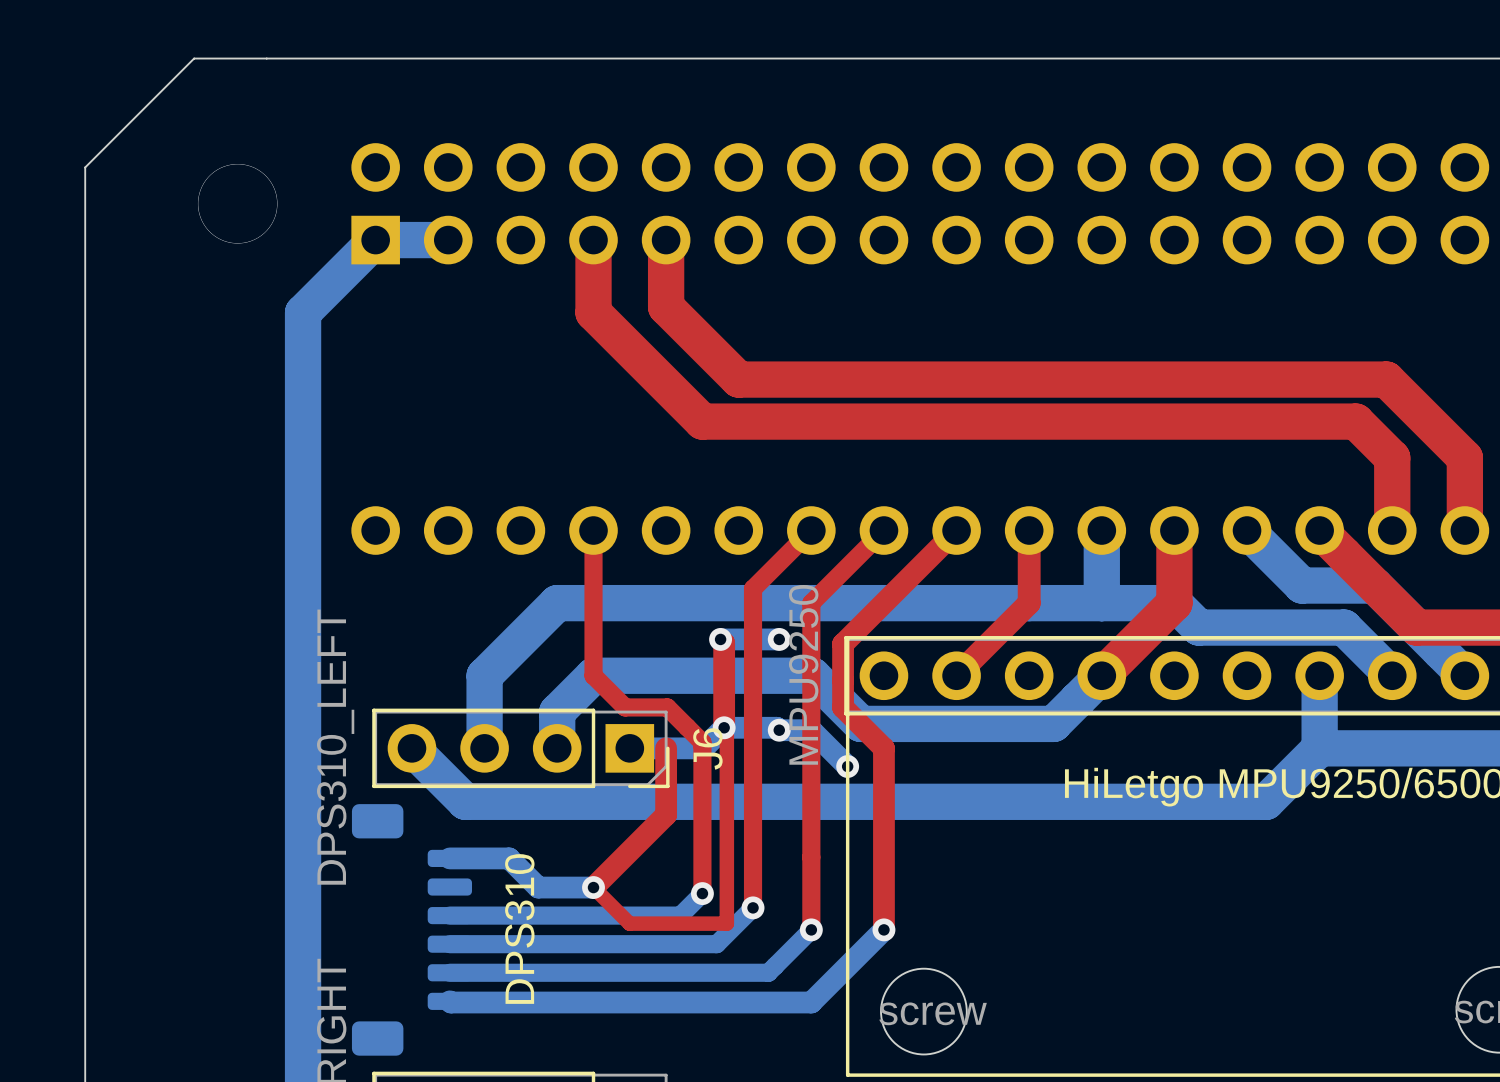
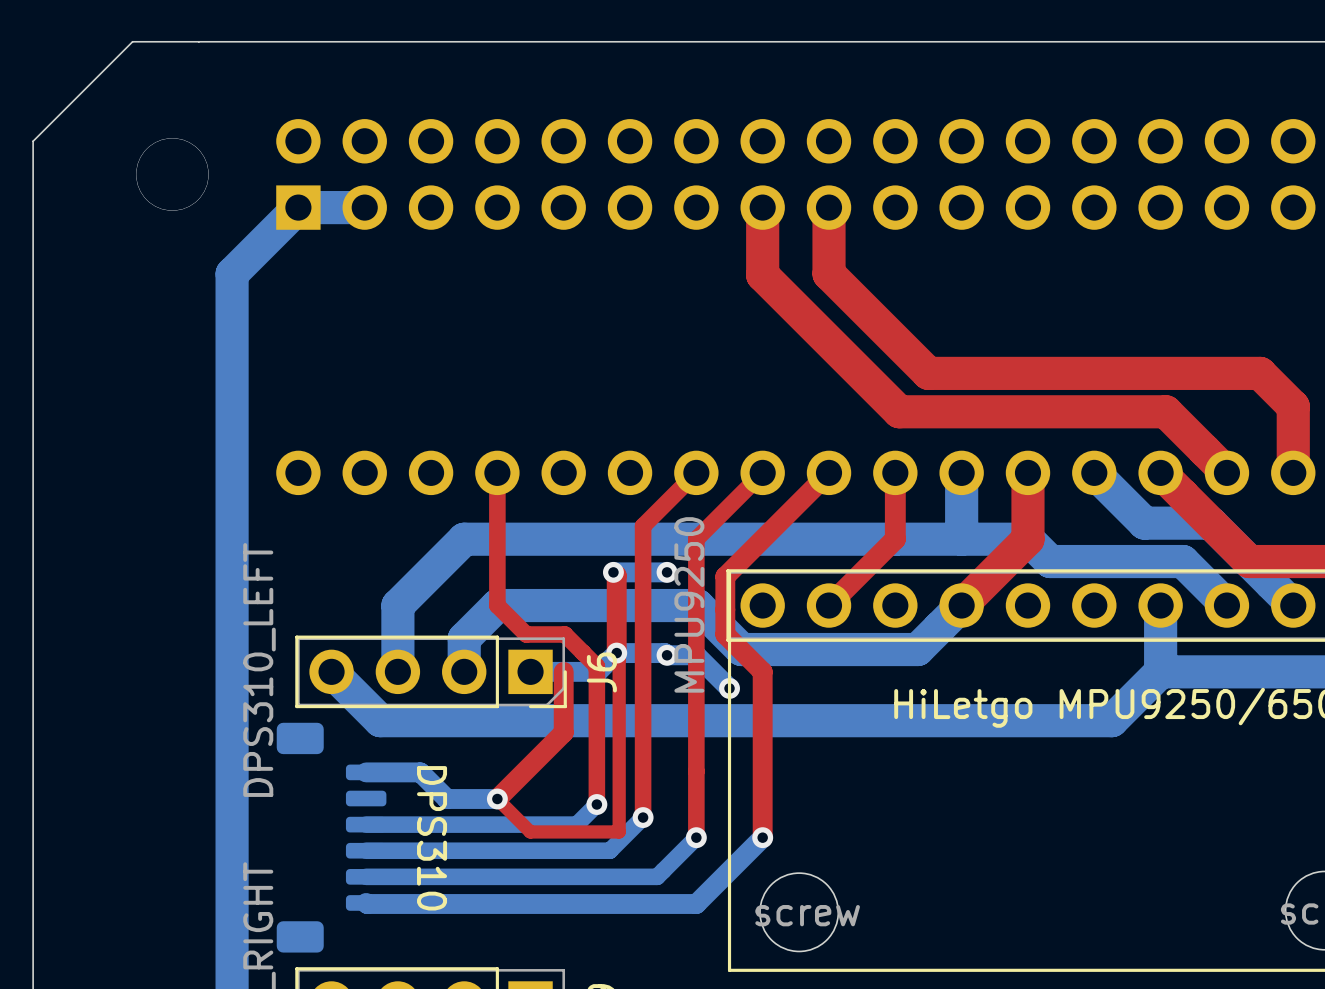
top track: (593, 240) (593, 312) (702, 421) (1065, 421) -> (829, 207) (829, 273) (928, 373)
top track: (666, 240) (666, 306) (738, 379) (1386, 379) (1428, 421) -> none
top track: none -> (762, 207) (762, 275) (899, 411) (1165, 411) (1226, 472)
top track: (1355, 421) (1392, 457) (1392, 530) -> (1193, 373) (1260, 373)
text rotation: 0° (519, 929) -> 180° (432, 838)

